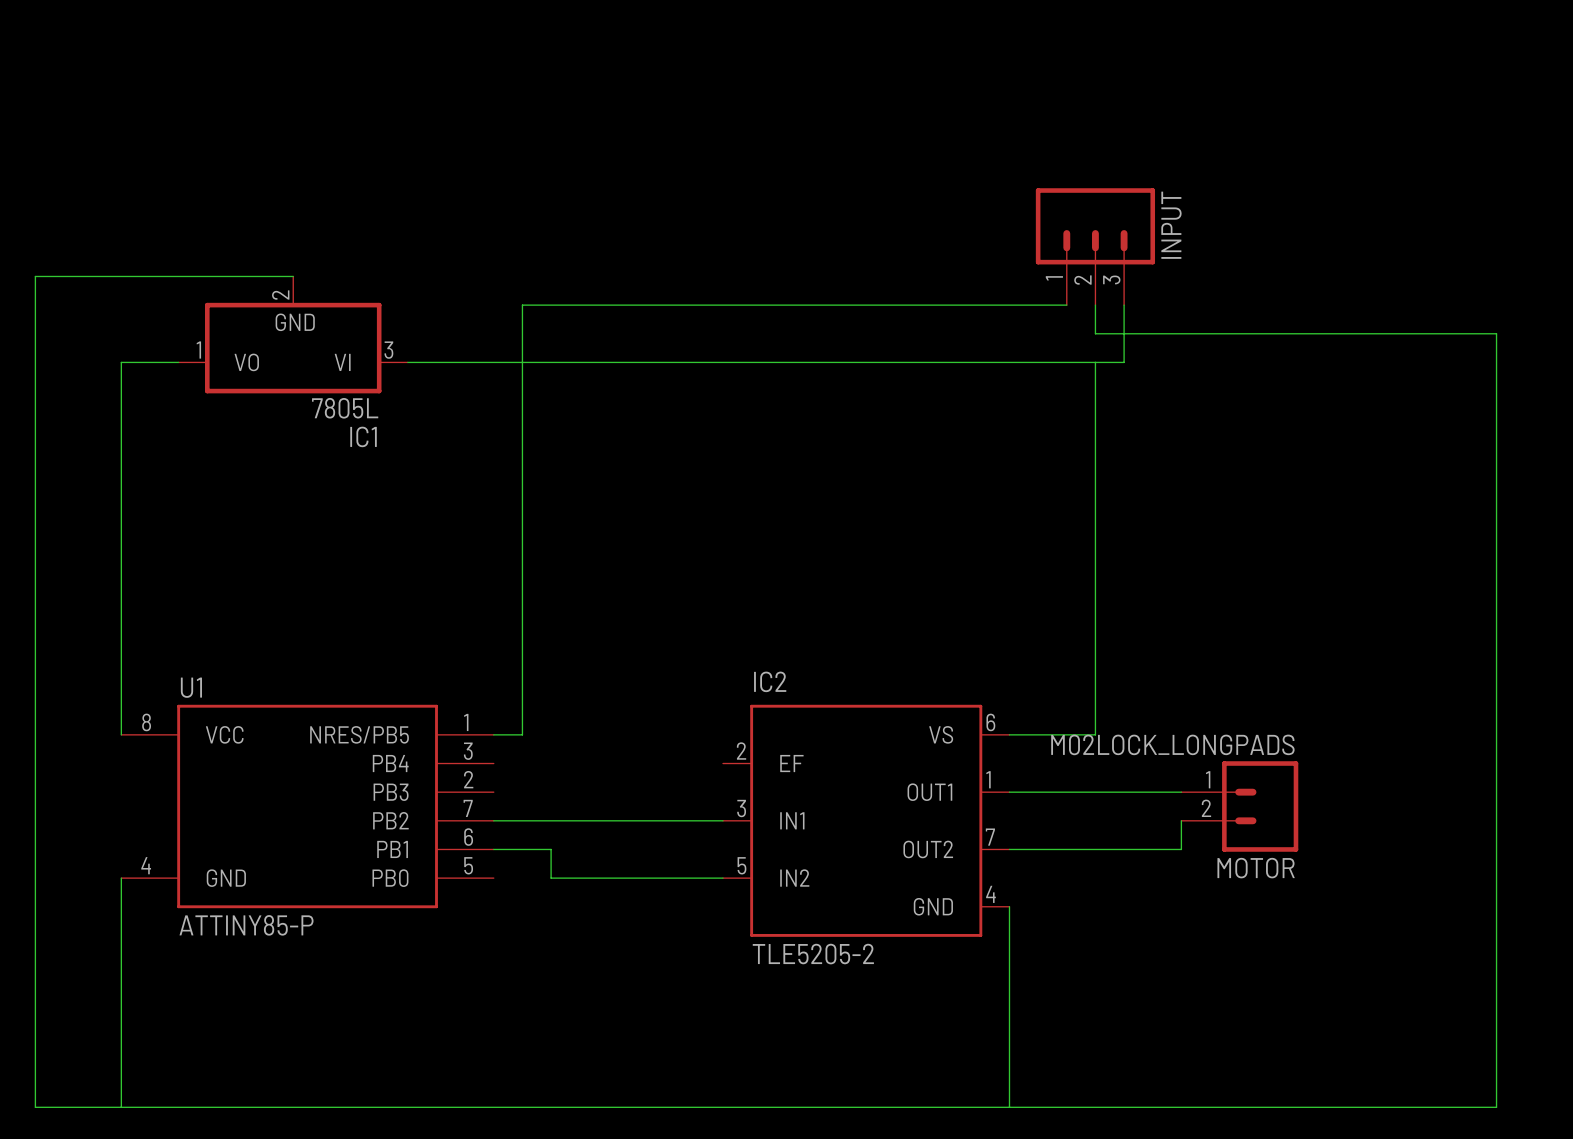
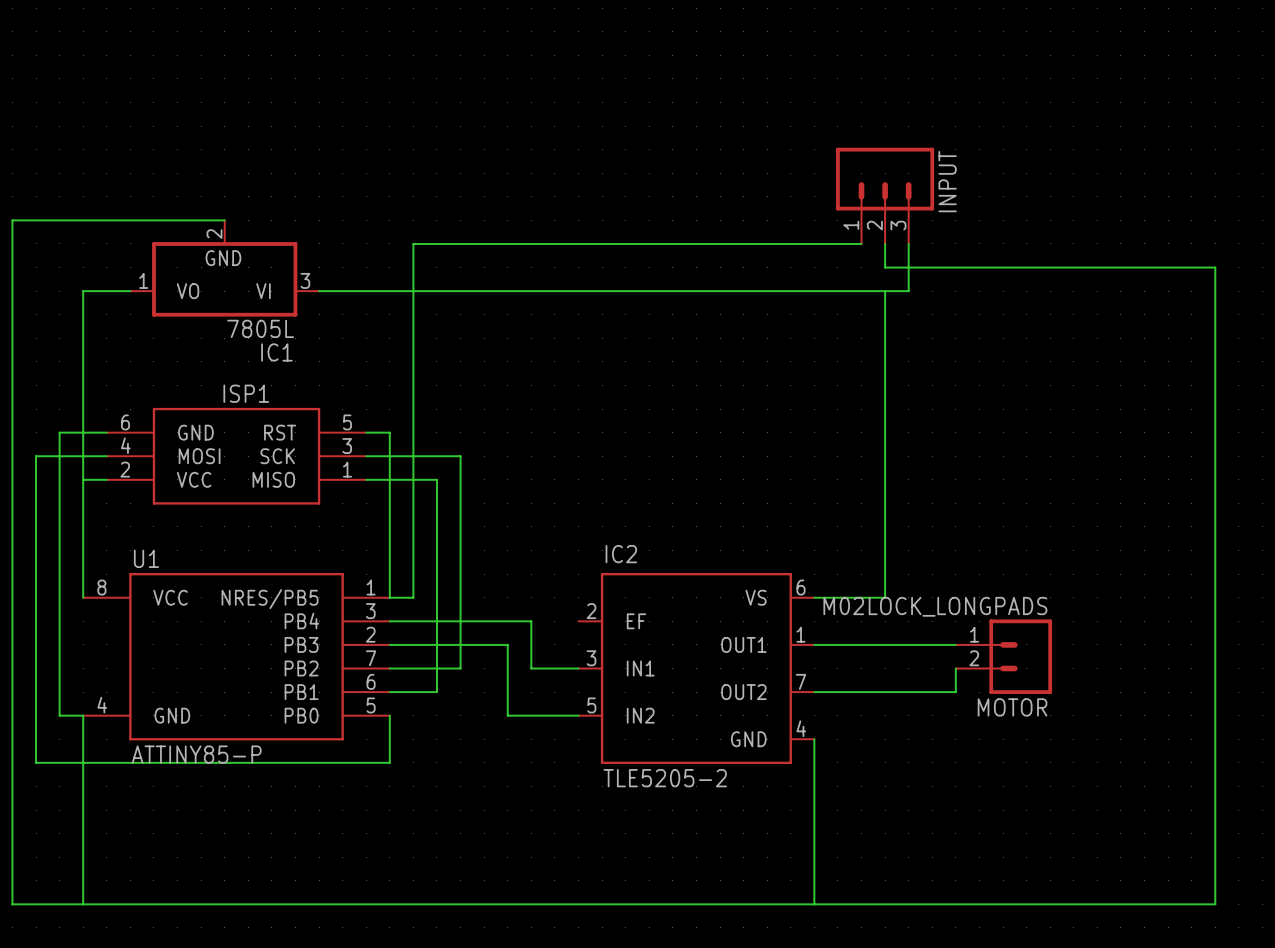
wire: none -> (106, 432) (59, 432) (59, 715) (83, 715)
wire: none -> (366, 432) (389, 432) (389, 597)
wire: none -> (106, 456) (36, 456) (36, 762) (389, 762) (389, 715)
ISP1: none -> (236, 456)
wire: none -> (366, 456) (460, 456) (460, 668)
wire: none -> (83, 479) (106, 479)
wire: none -> (366, 479) (436, 479) (436, 692)
wire: (579, 820) (665, 820) -> (389, 621) (531, 621) (531, 668)
wire: (551, 849) (551, 878) (637, 878) -> (389, 644) (507, 644) (507, 715)

